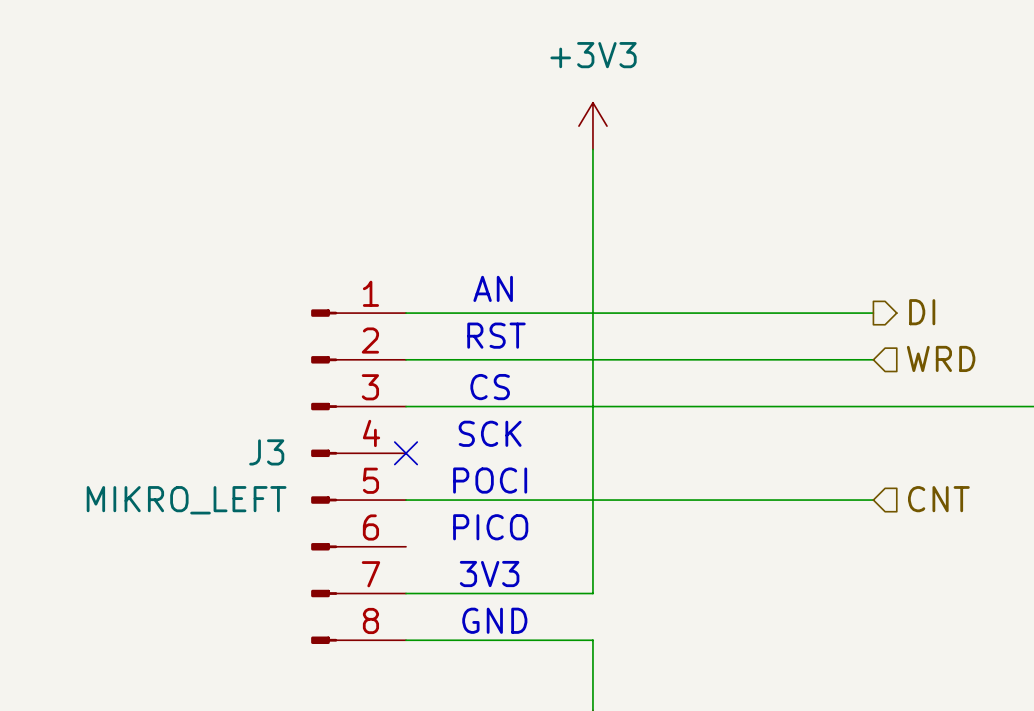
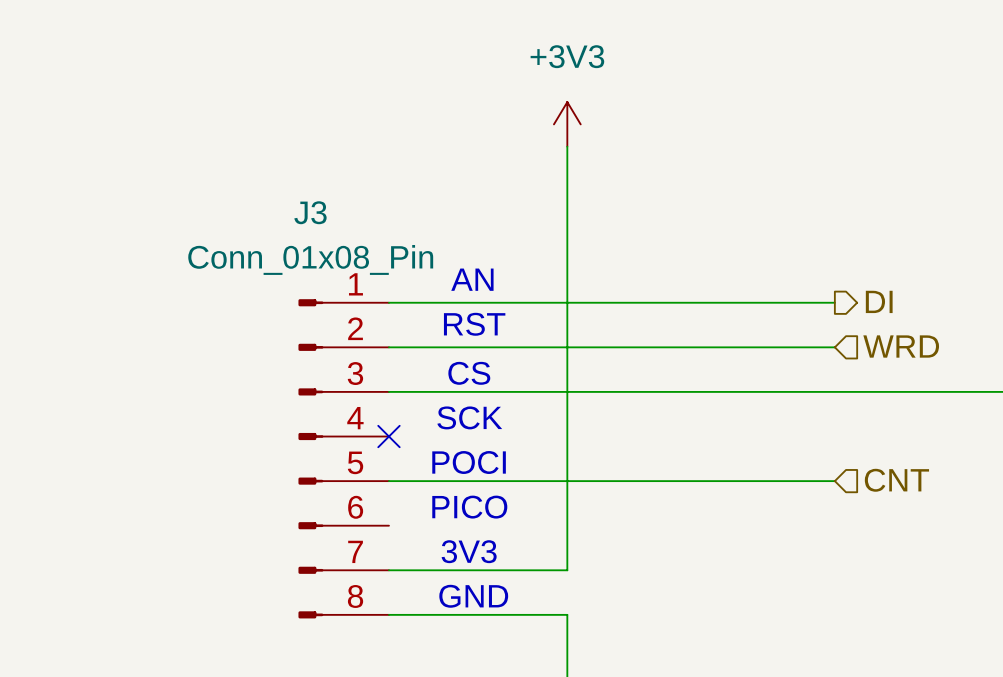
J3 name position: J3 (266, 452) -> J3 (310, 212)
J3 value: MIKRO_LEFT (186, 500) -> Conn_01x08_Pin (310, 259)

